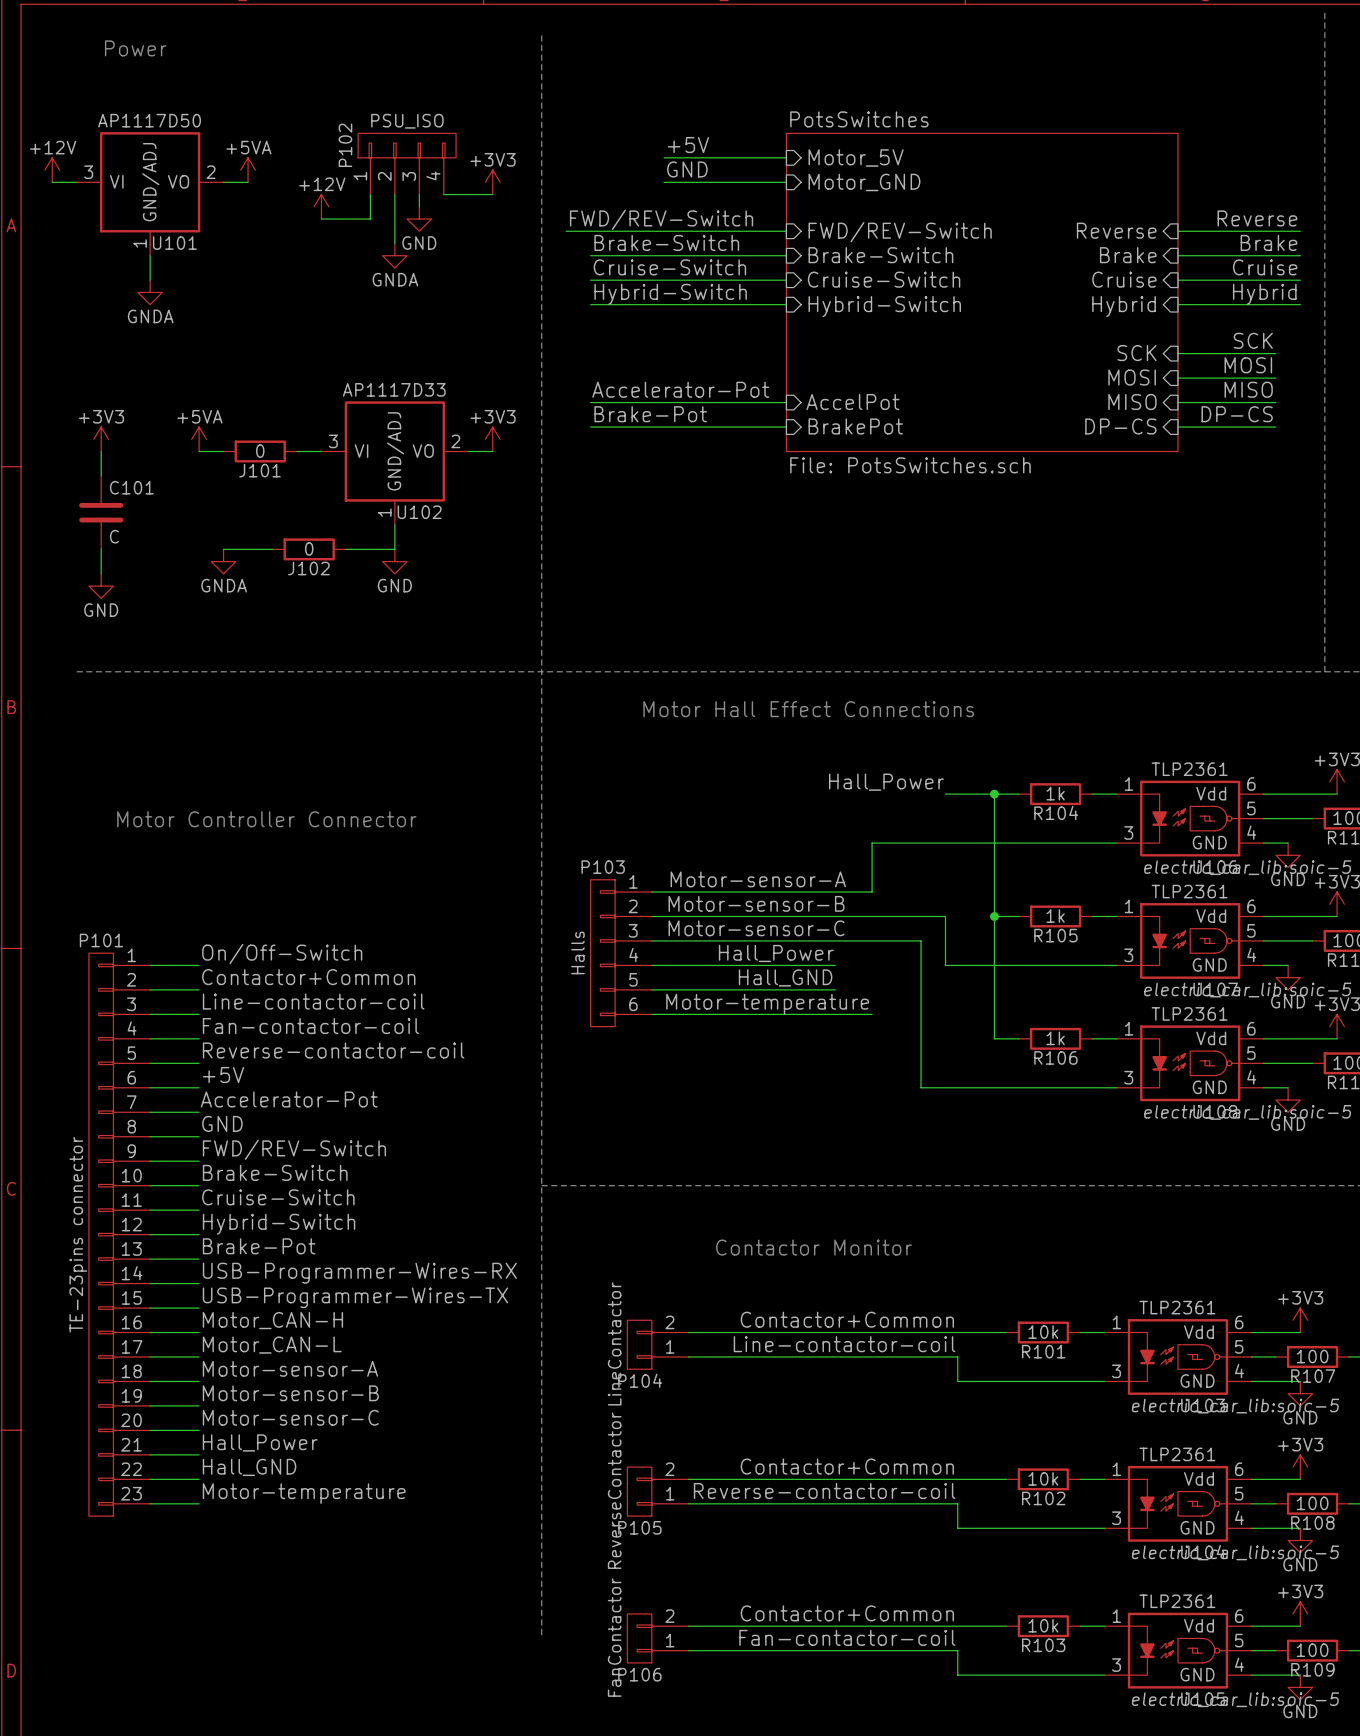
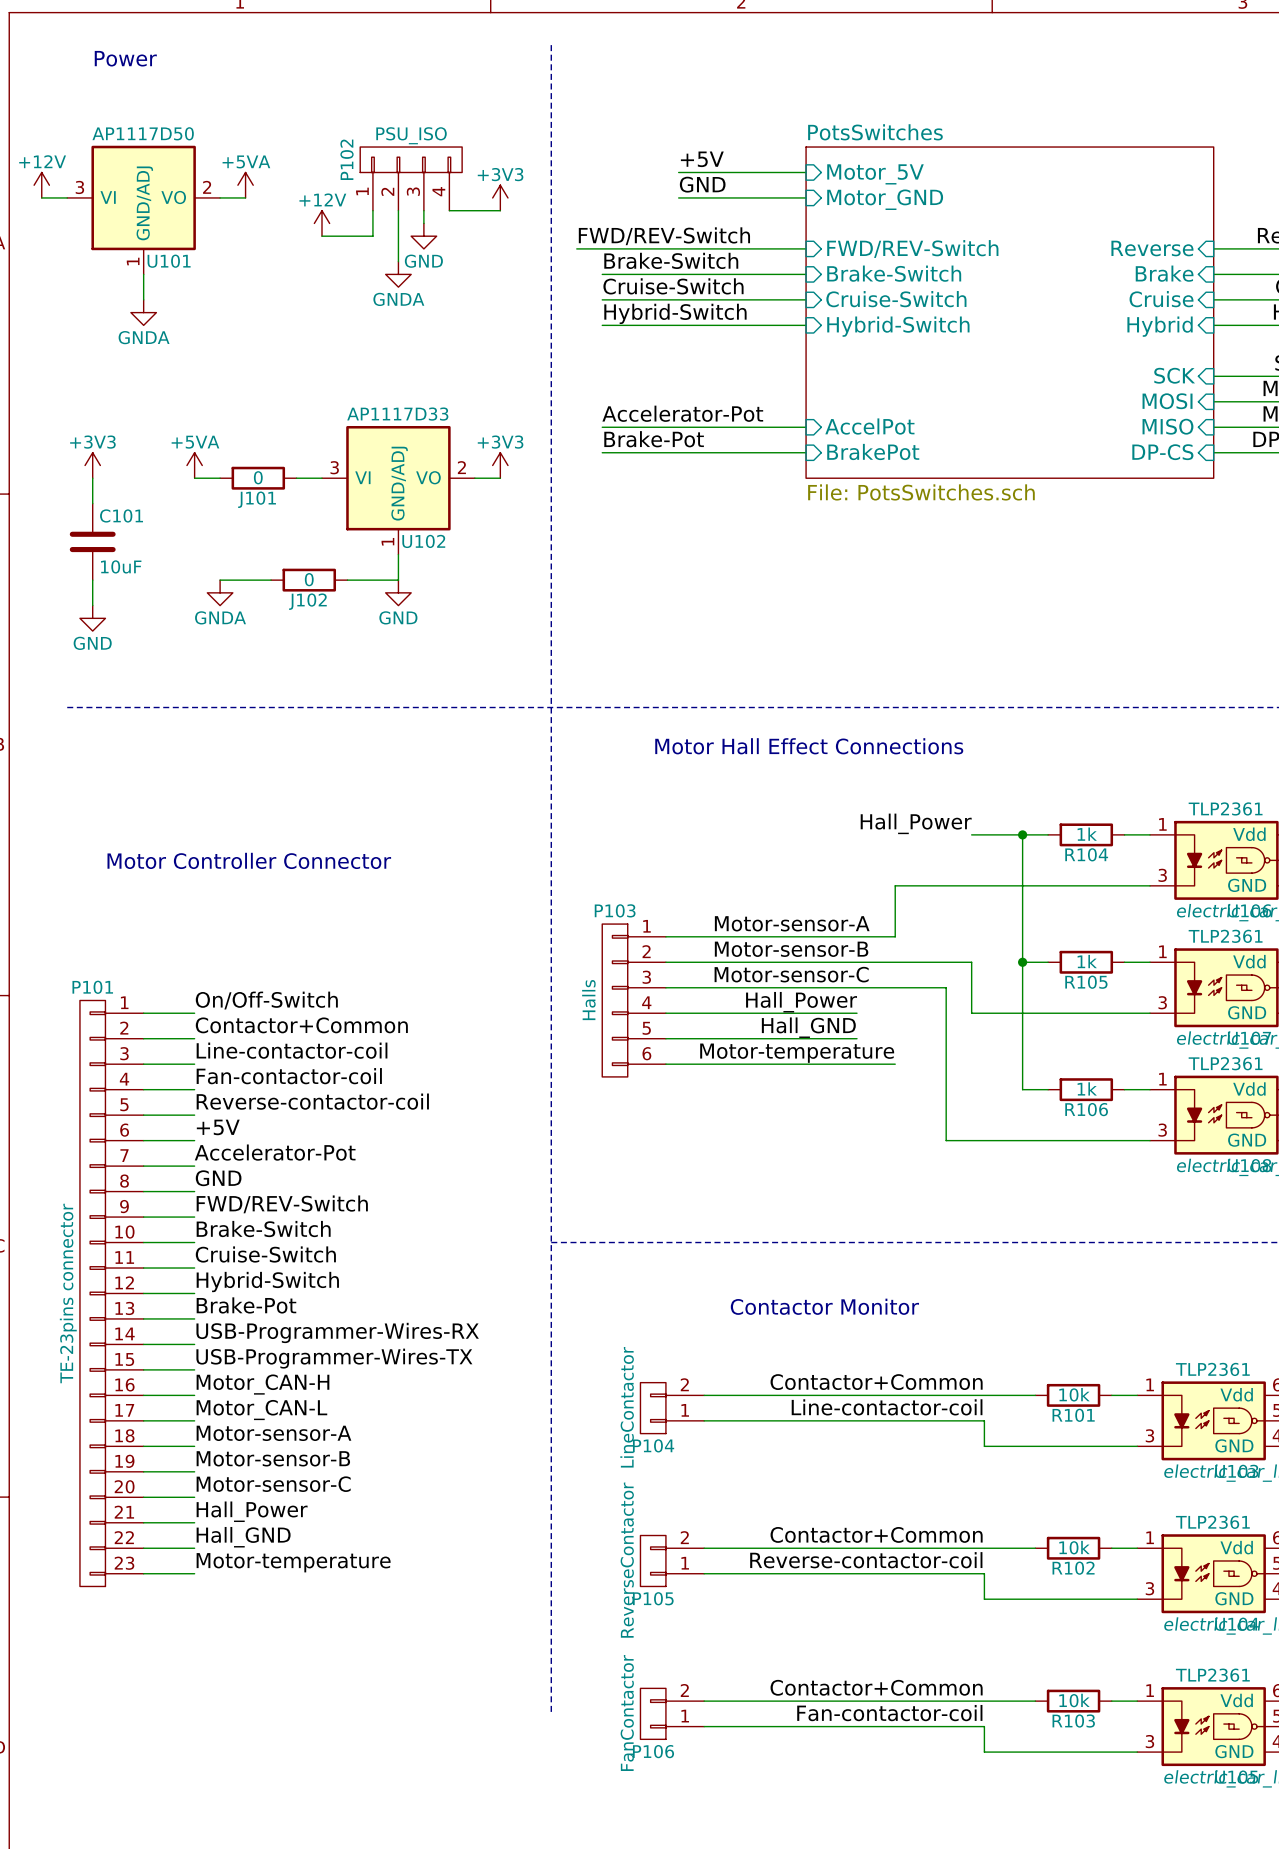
C101 value: C (114, 536) -> 10uF (121, 566)

